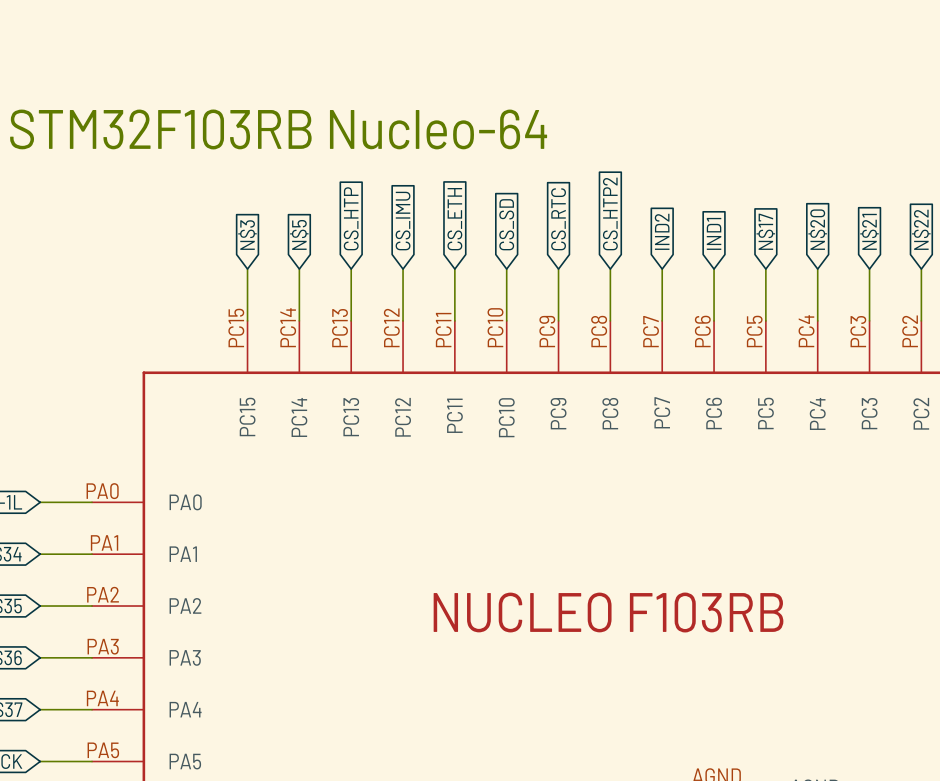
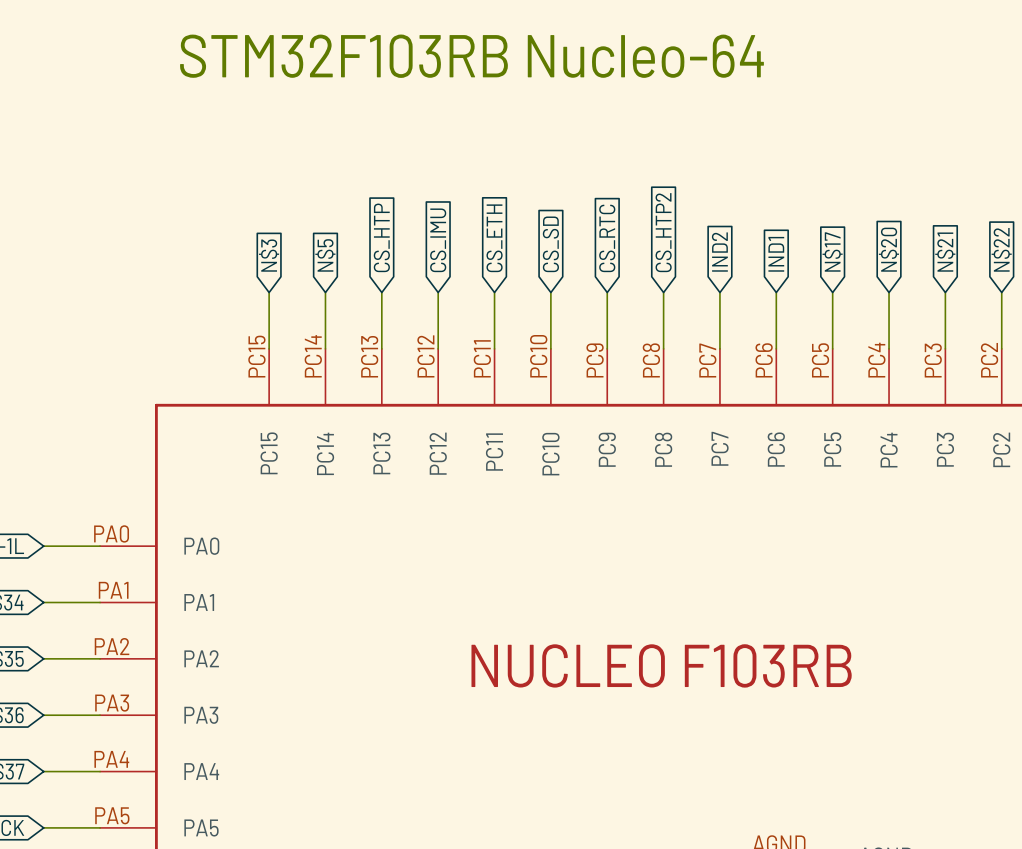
text position: STM32F103RB Nucleo-64 (278, 129) -> STM32F103RB Nucleo-64 (471, 56)

